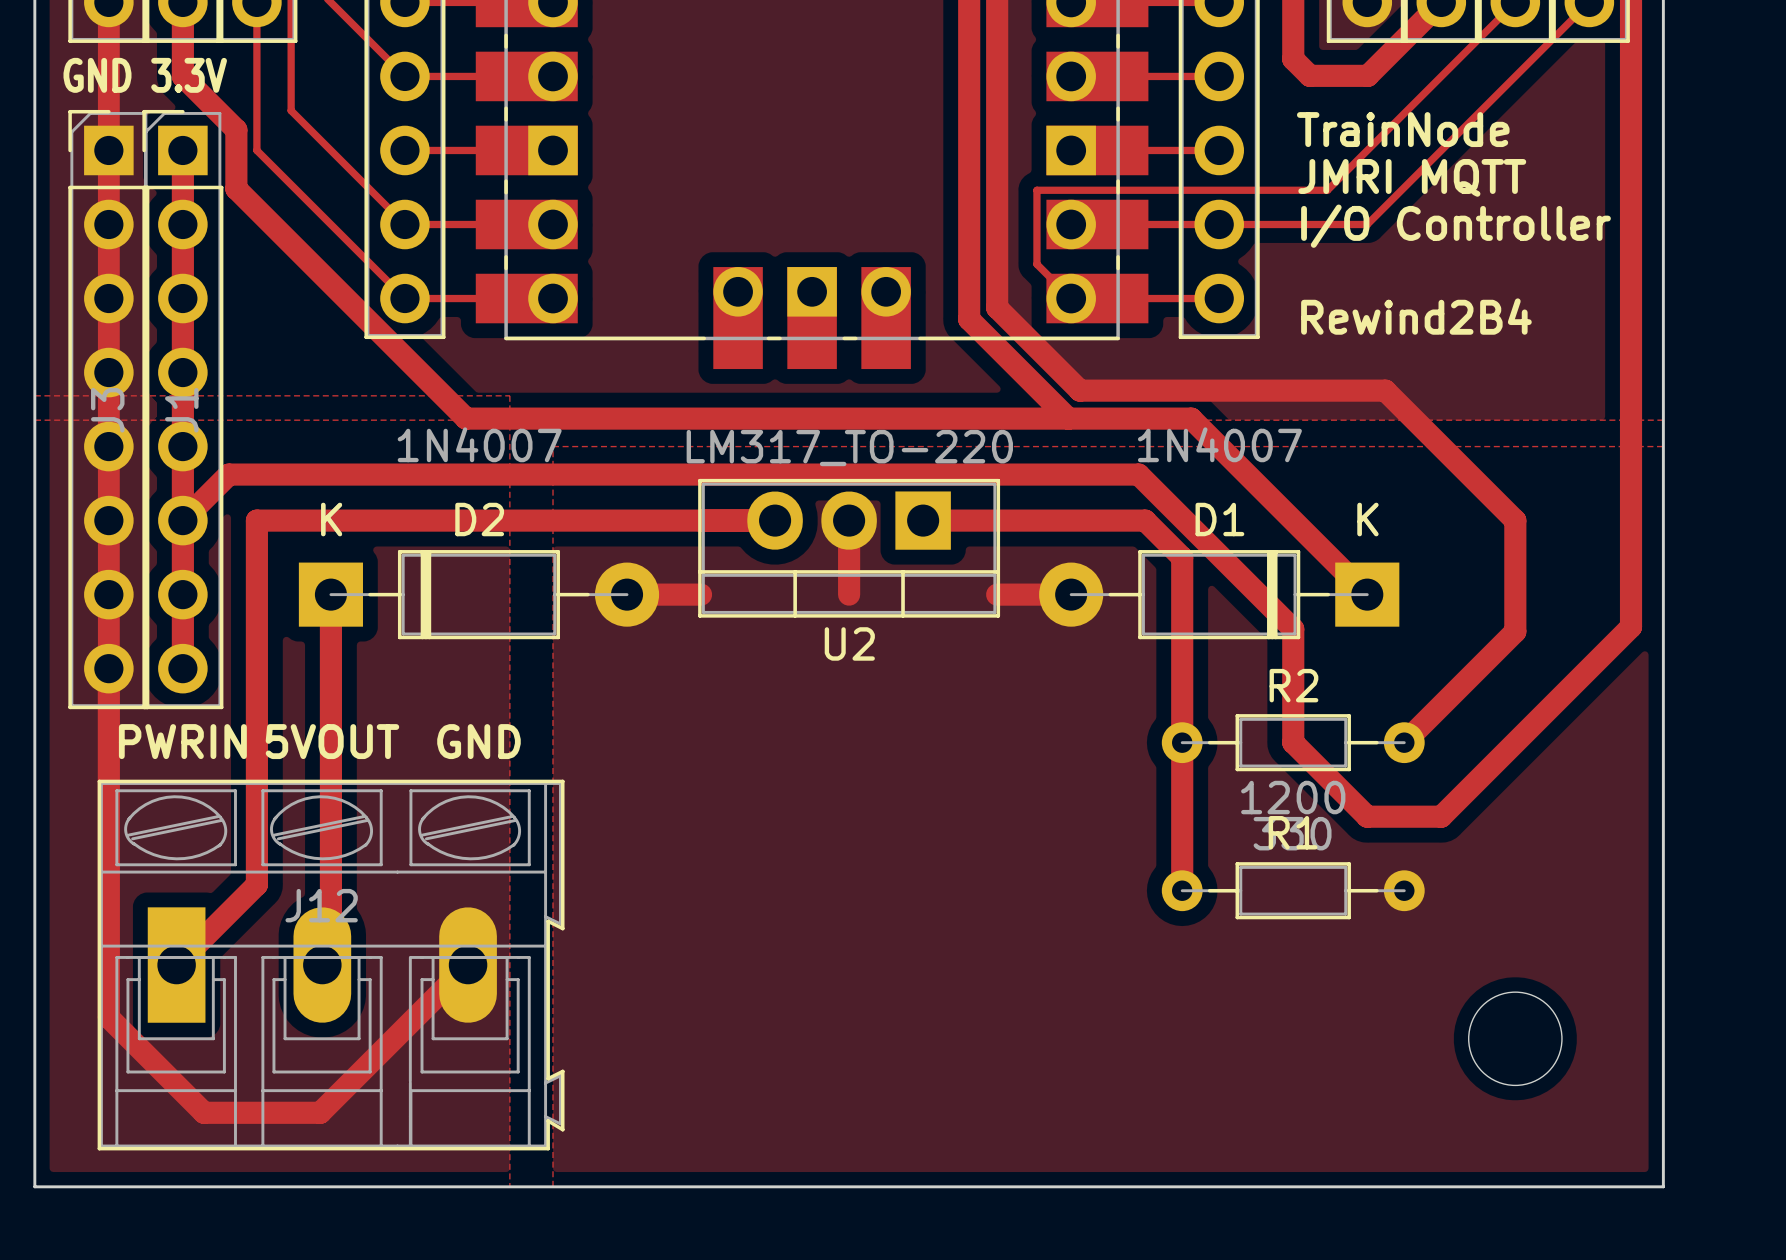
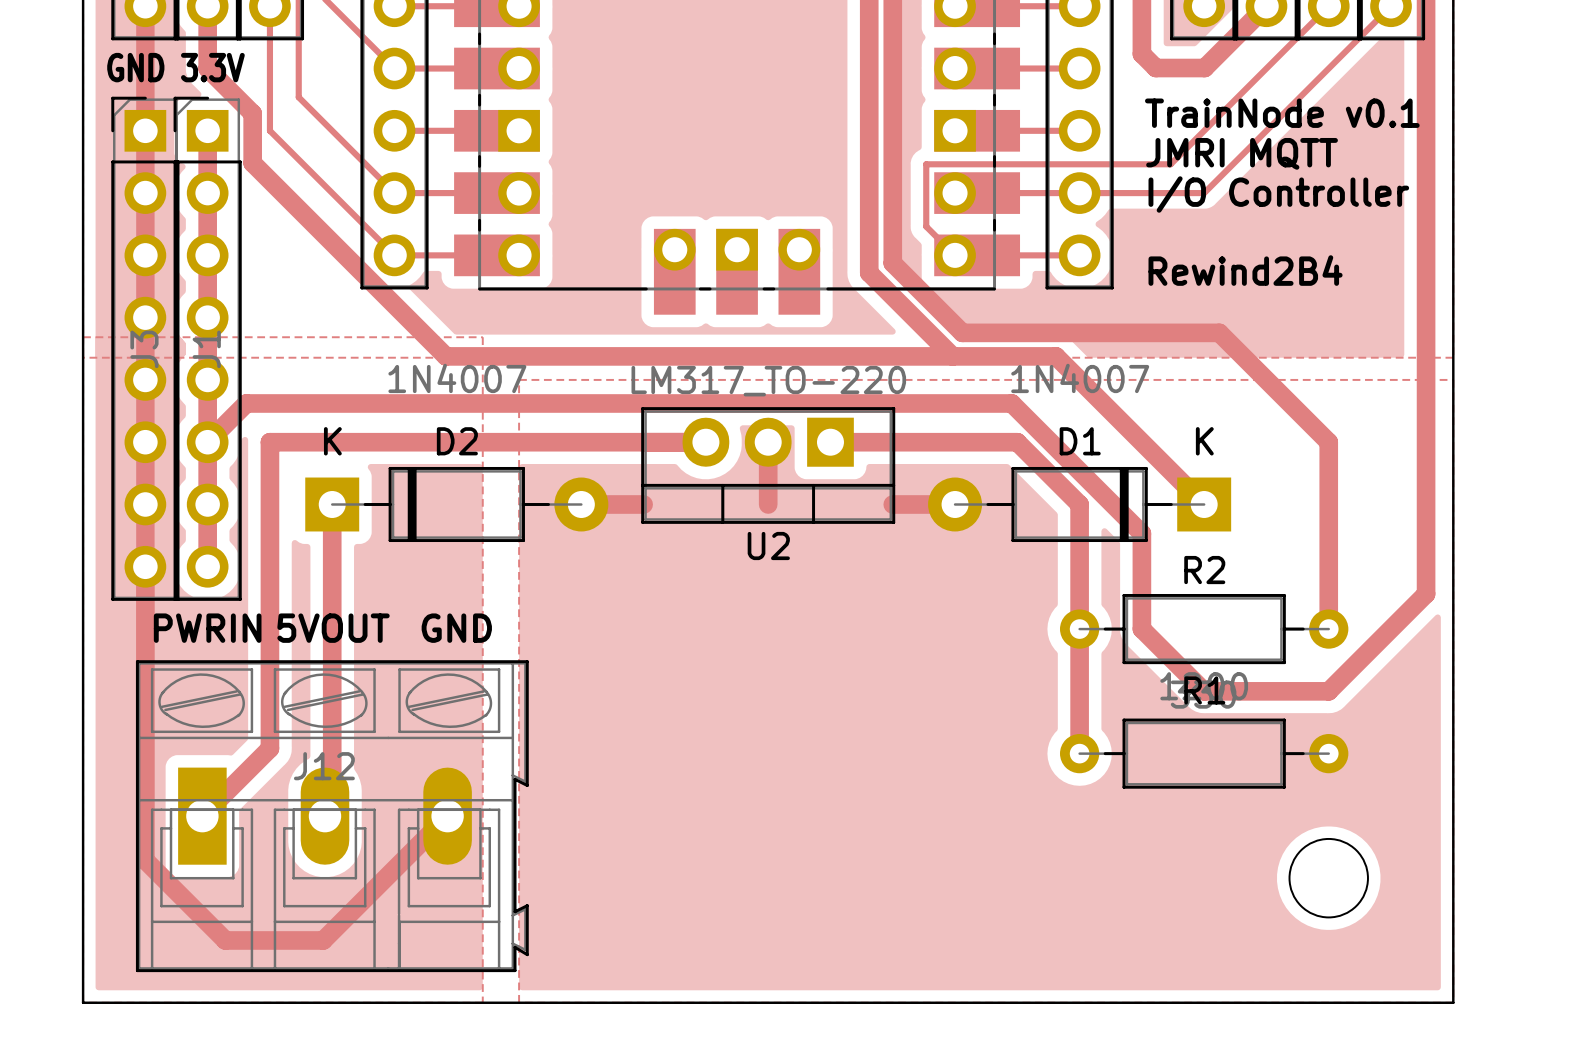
text: TrainNode (1403, 129) -> TrainNode v0.1 (1282, 113)
top track: (1182, 557) (1182, 890) -> (1048, 473) (1079, 504) (1079, 753)
top track: (1631, 626) (1441, 816) -> (1426, 531) (1426, 594) (1328, 691) (1266, 691)
top track: (1515, 631) (1404, 742) -> (1328, 535) (1328, 629)
R2 footprint: [1161, 714, 1425, 772] -> [1060, 593, 1349, 665]
R1 footprint: [1161, 862, 1425, 920] -> [1060, 718, 1349, 789]

